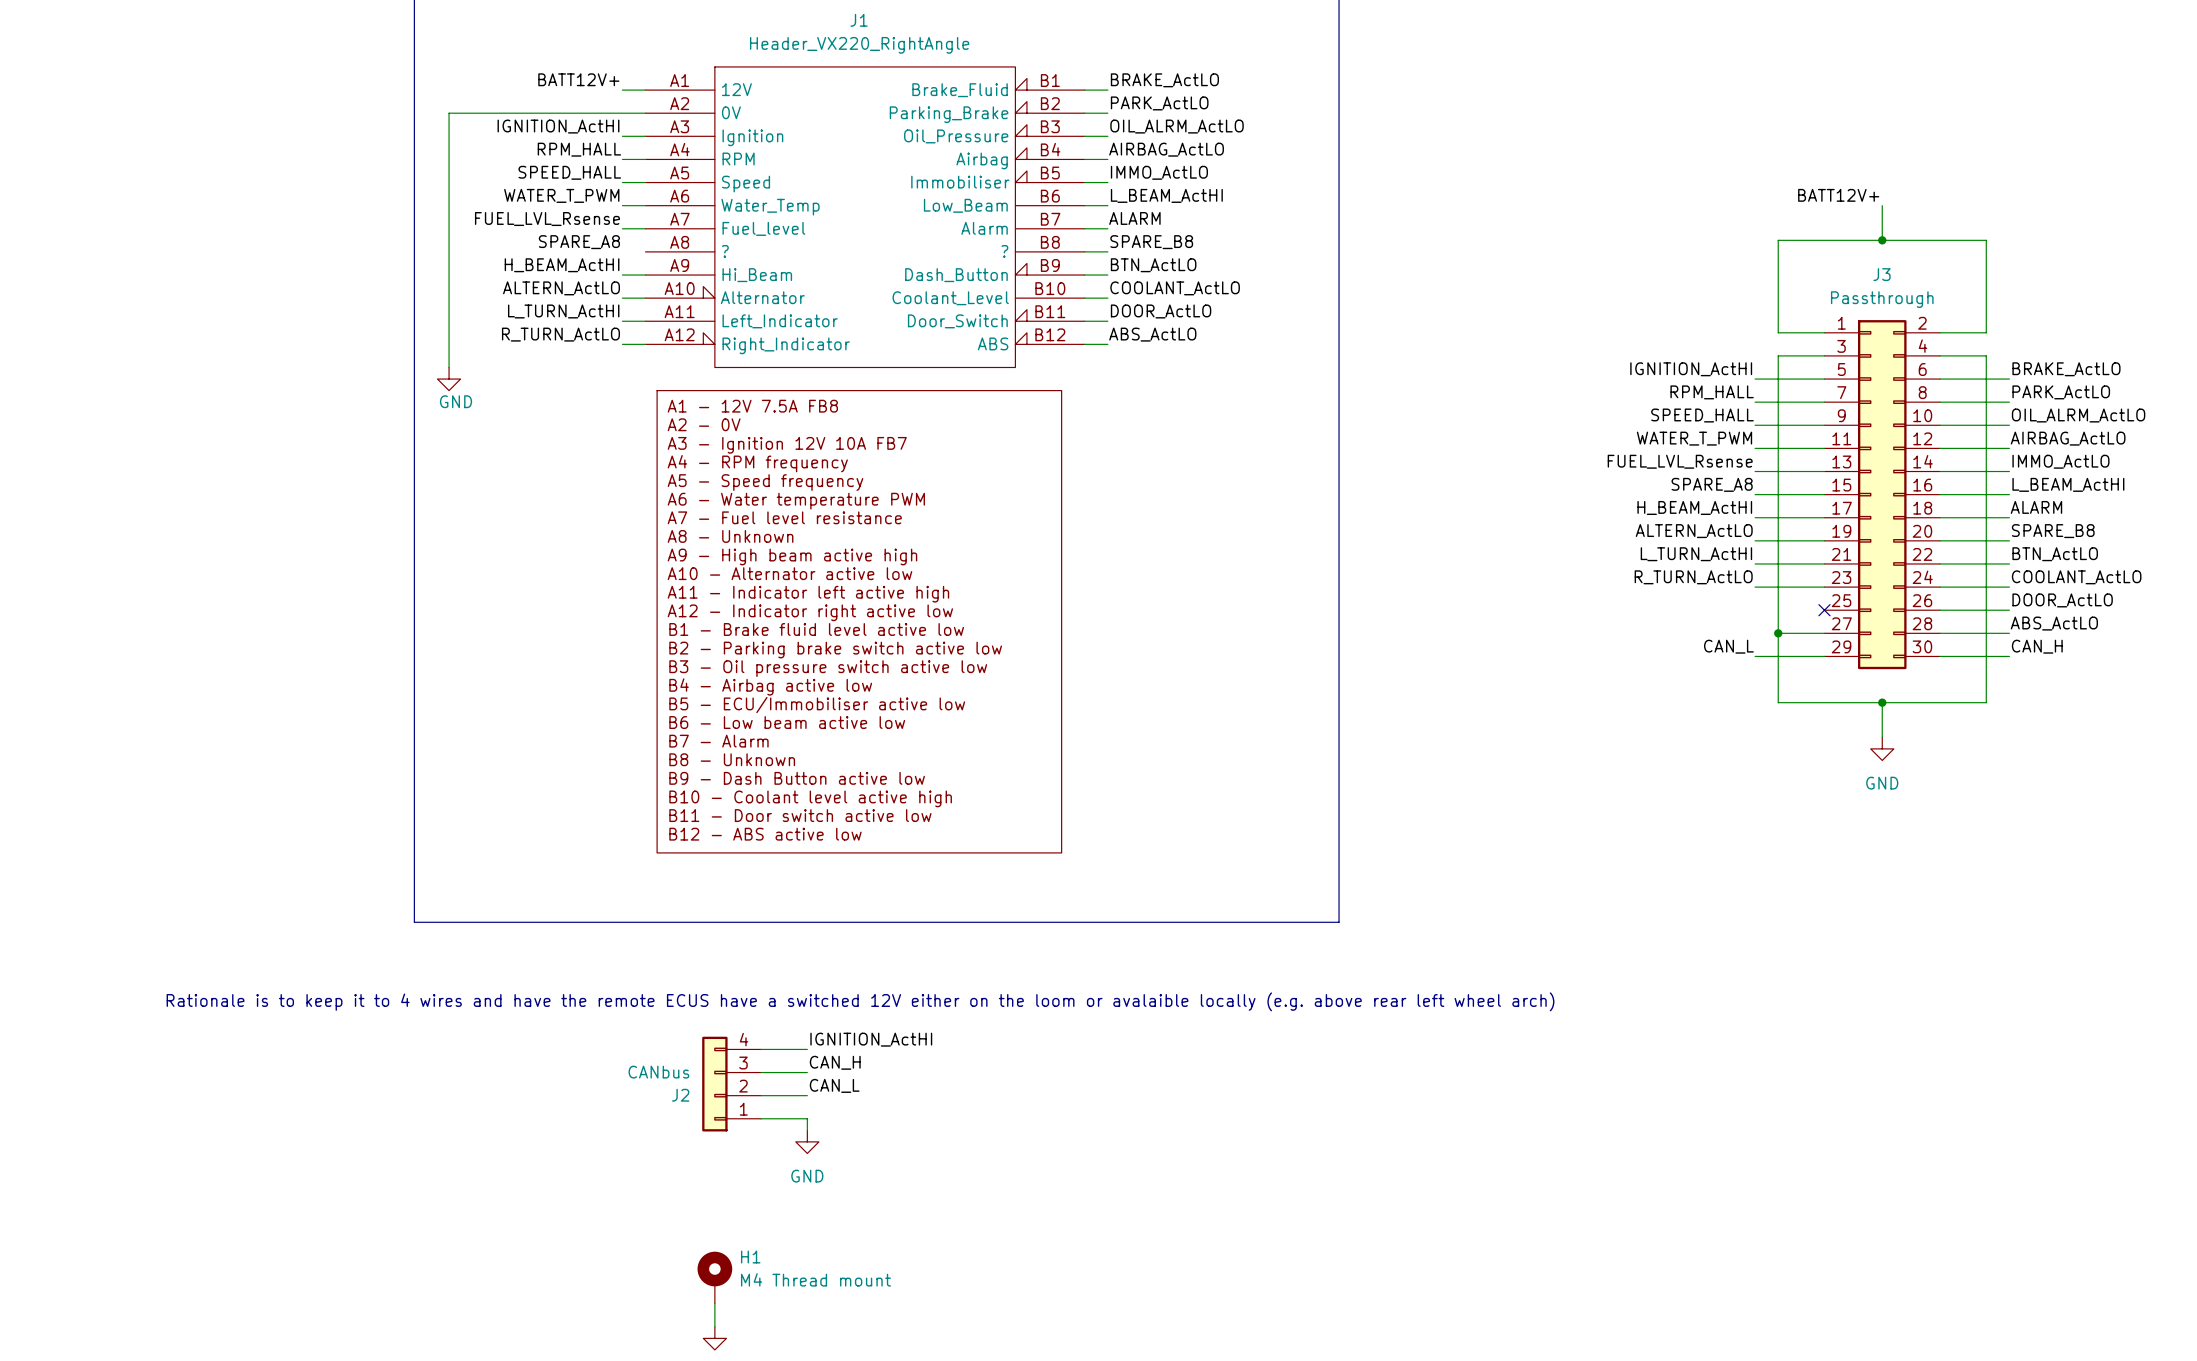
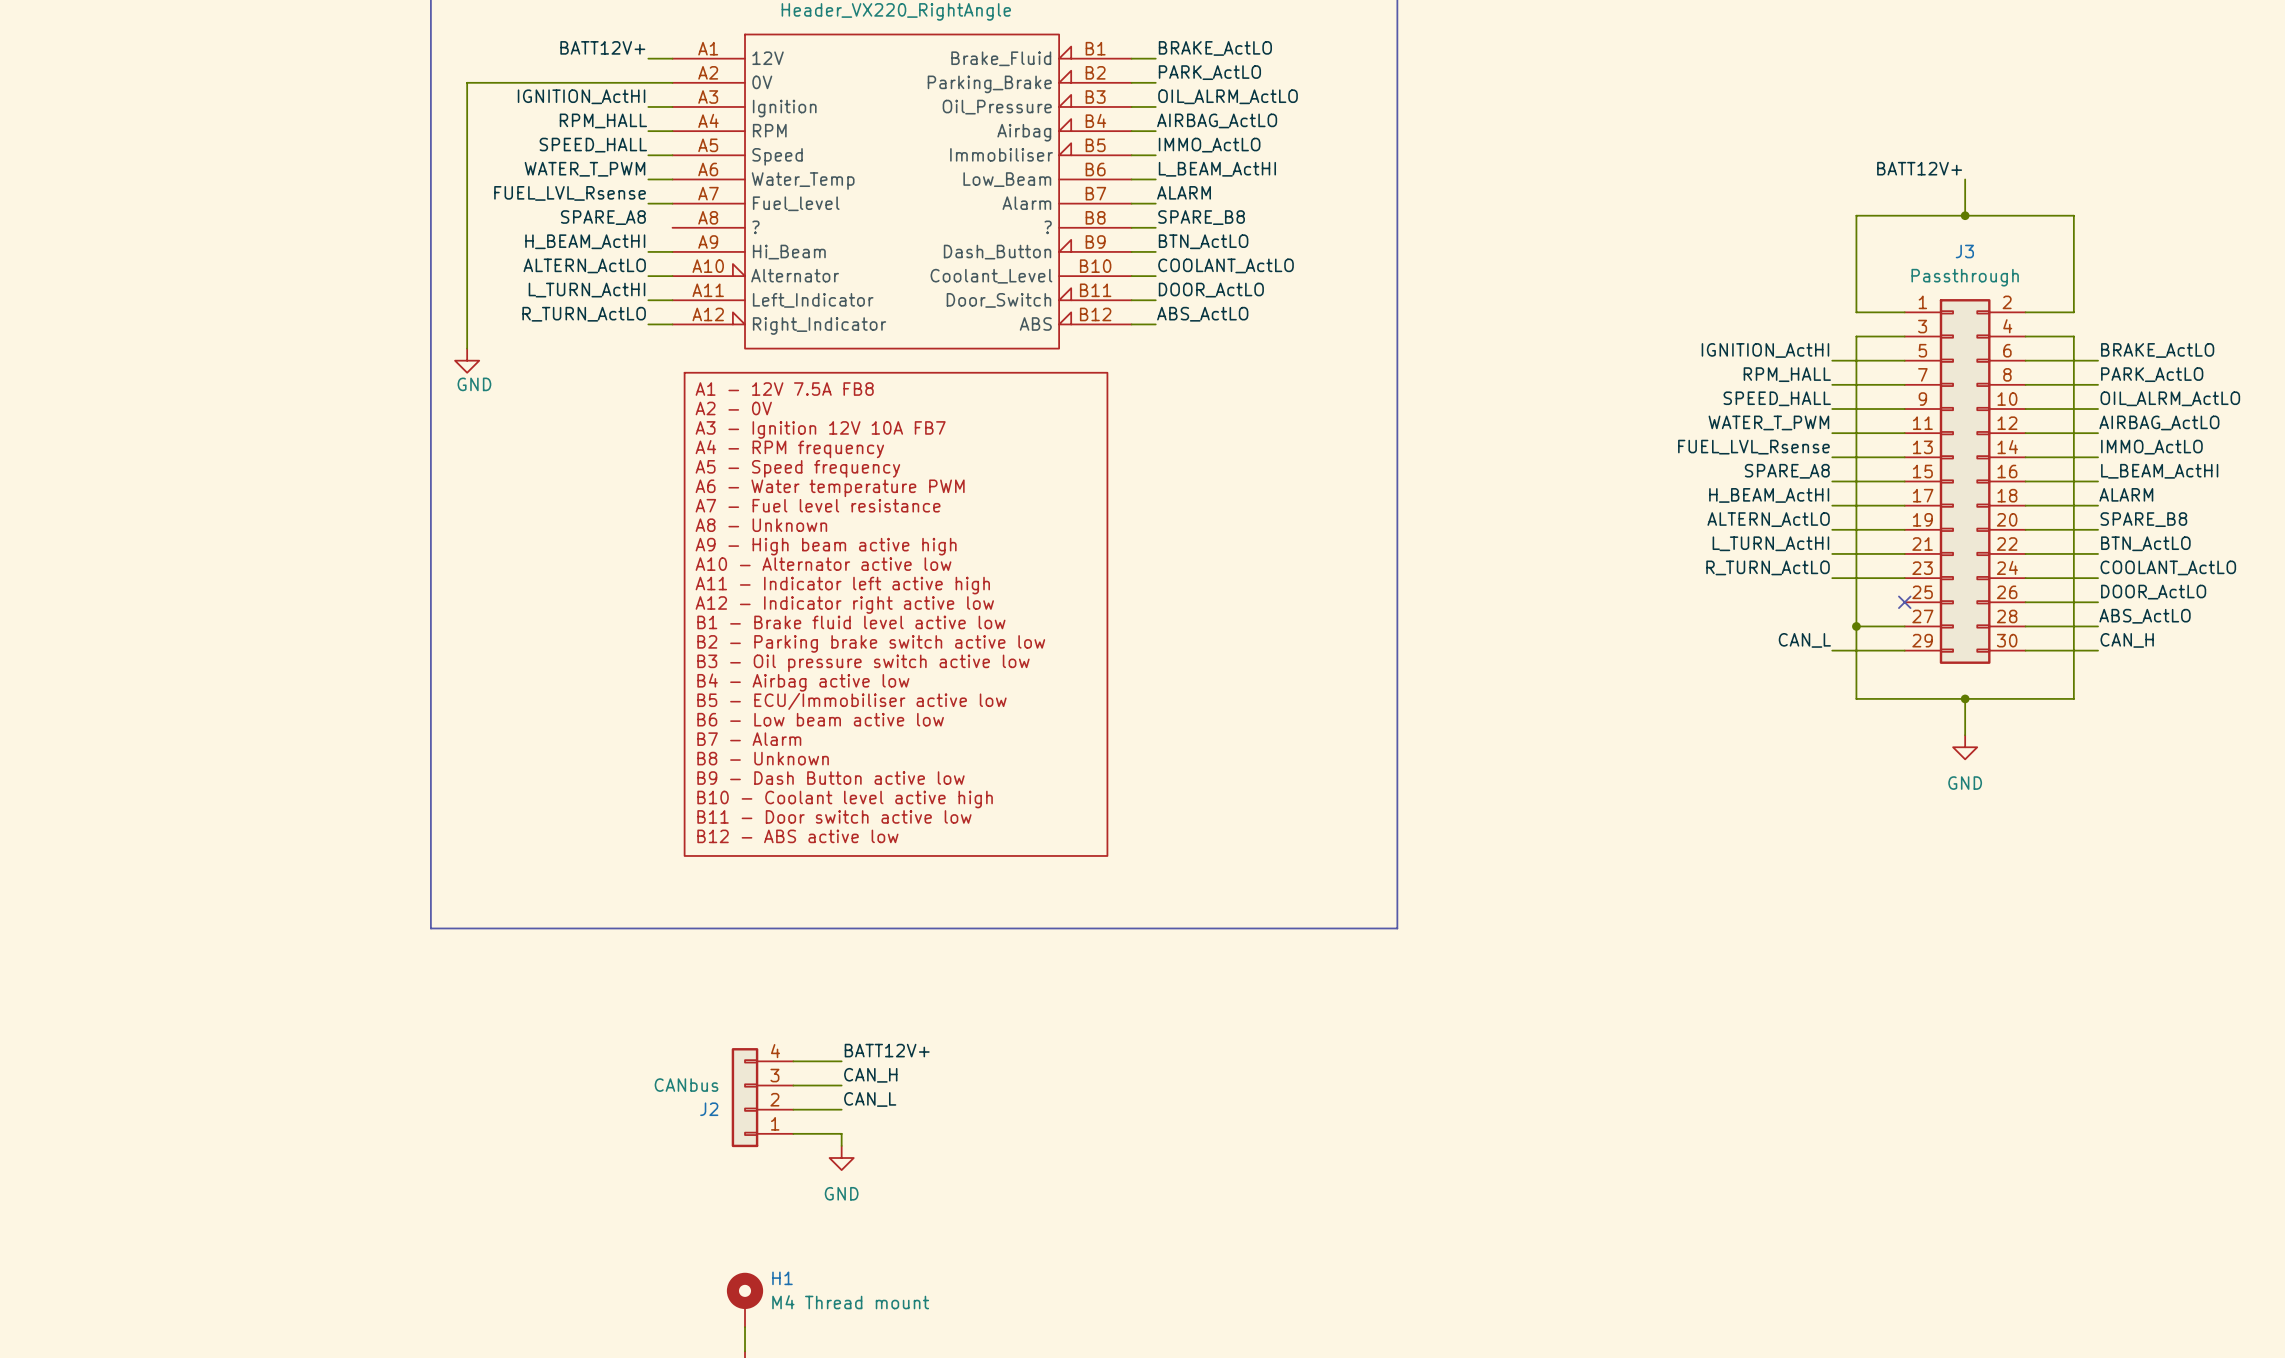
text: Rationale is to keep it to 4 wires and have the remote ECUS have a switched 12V either on the loom or avalaible locally (e.g. above rear left wheel arch) (860, 1001) -> none
label: IGNITION_ActHI (871, 1039) -> BATT12V+ (887, 1050)

